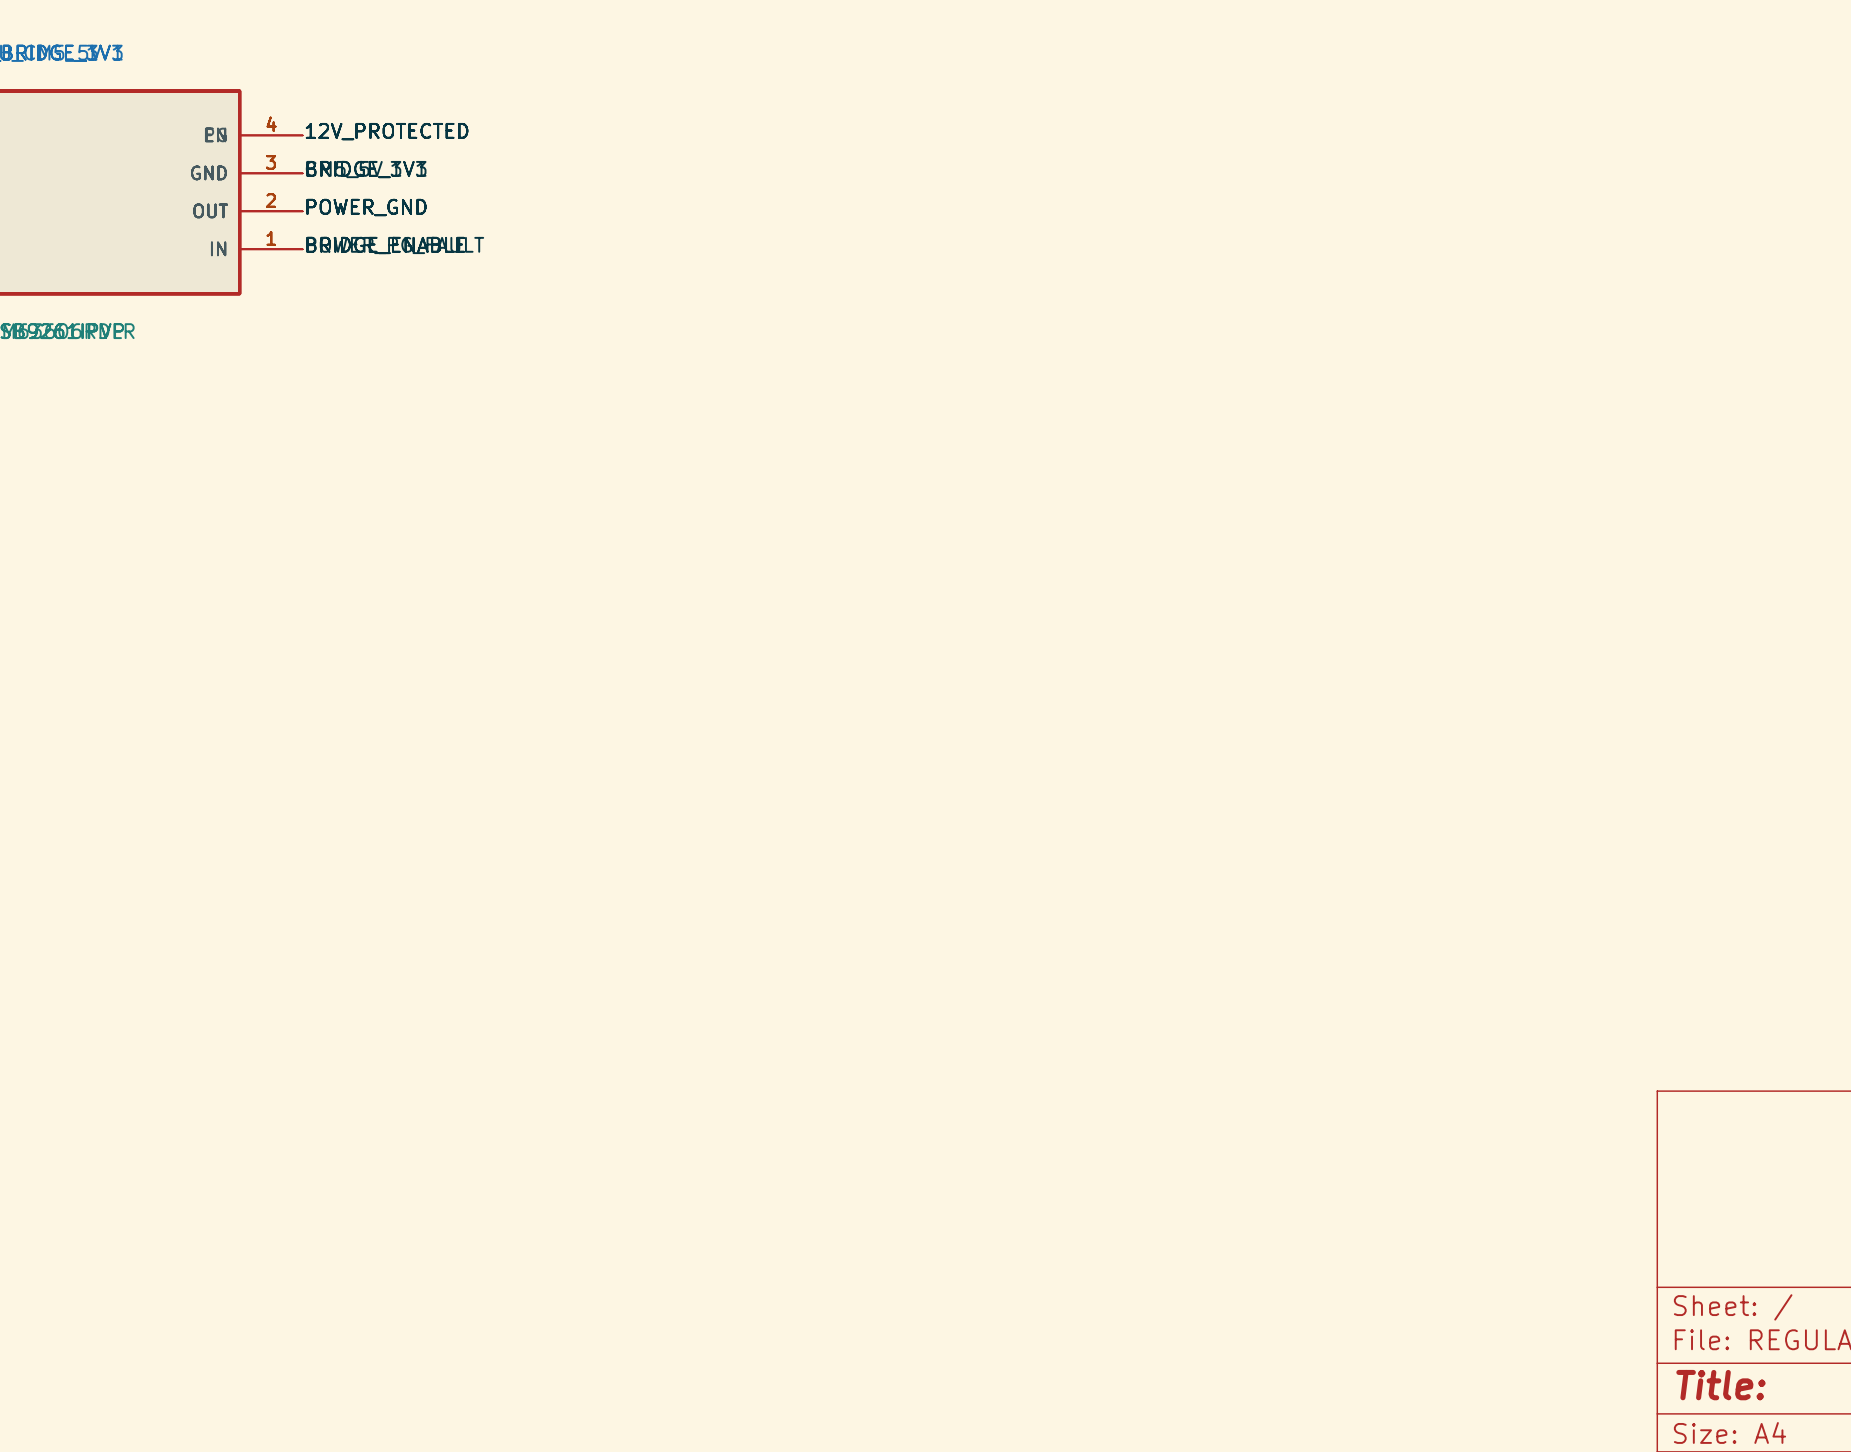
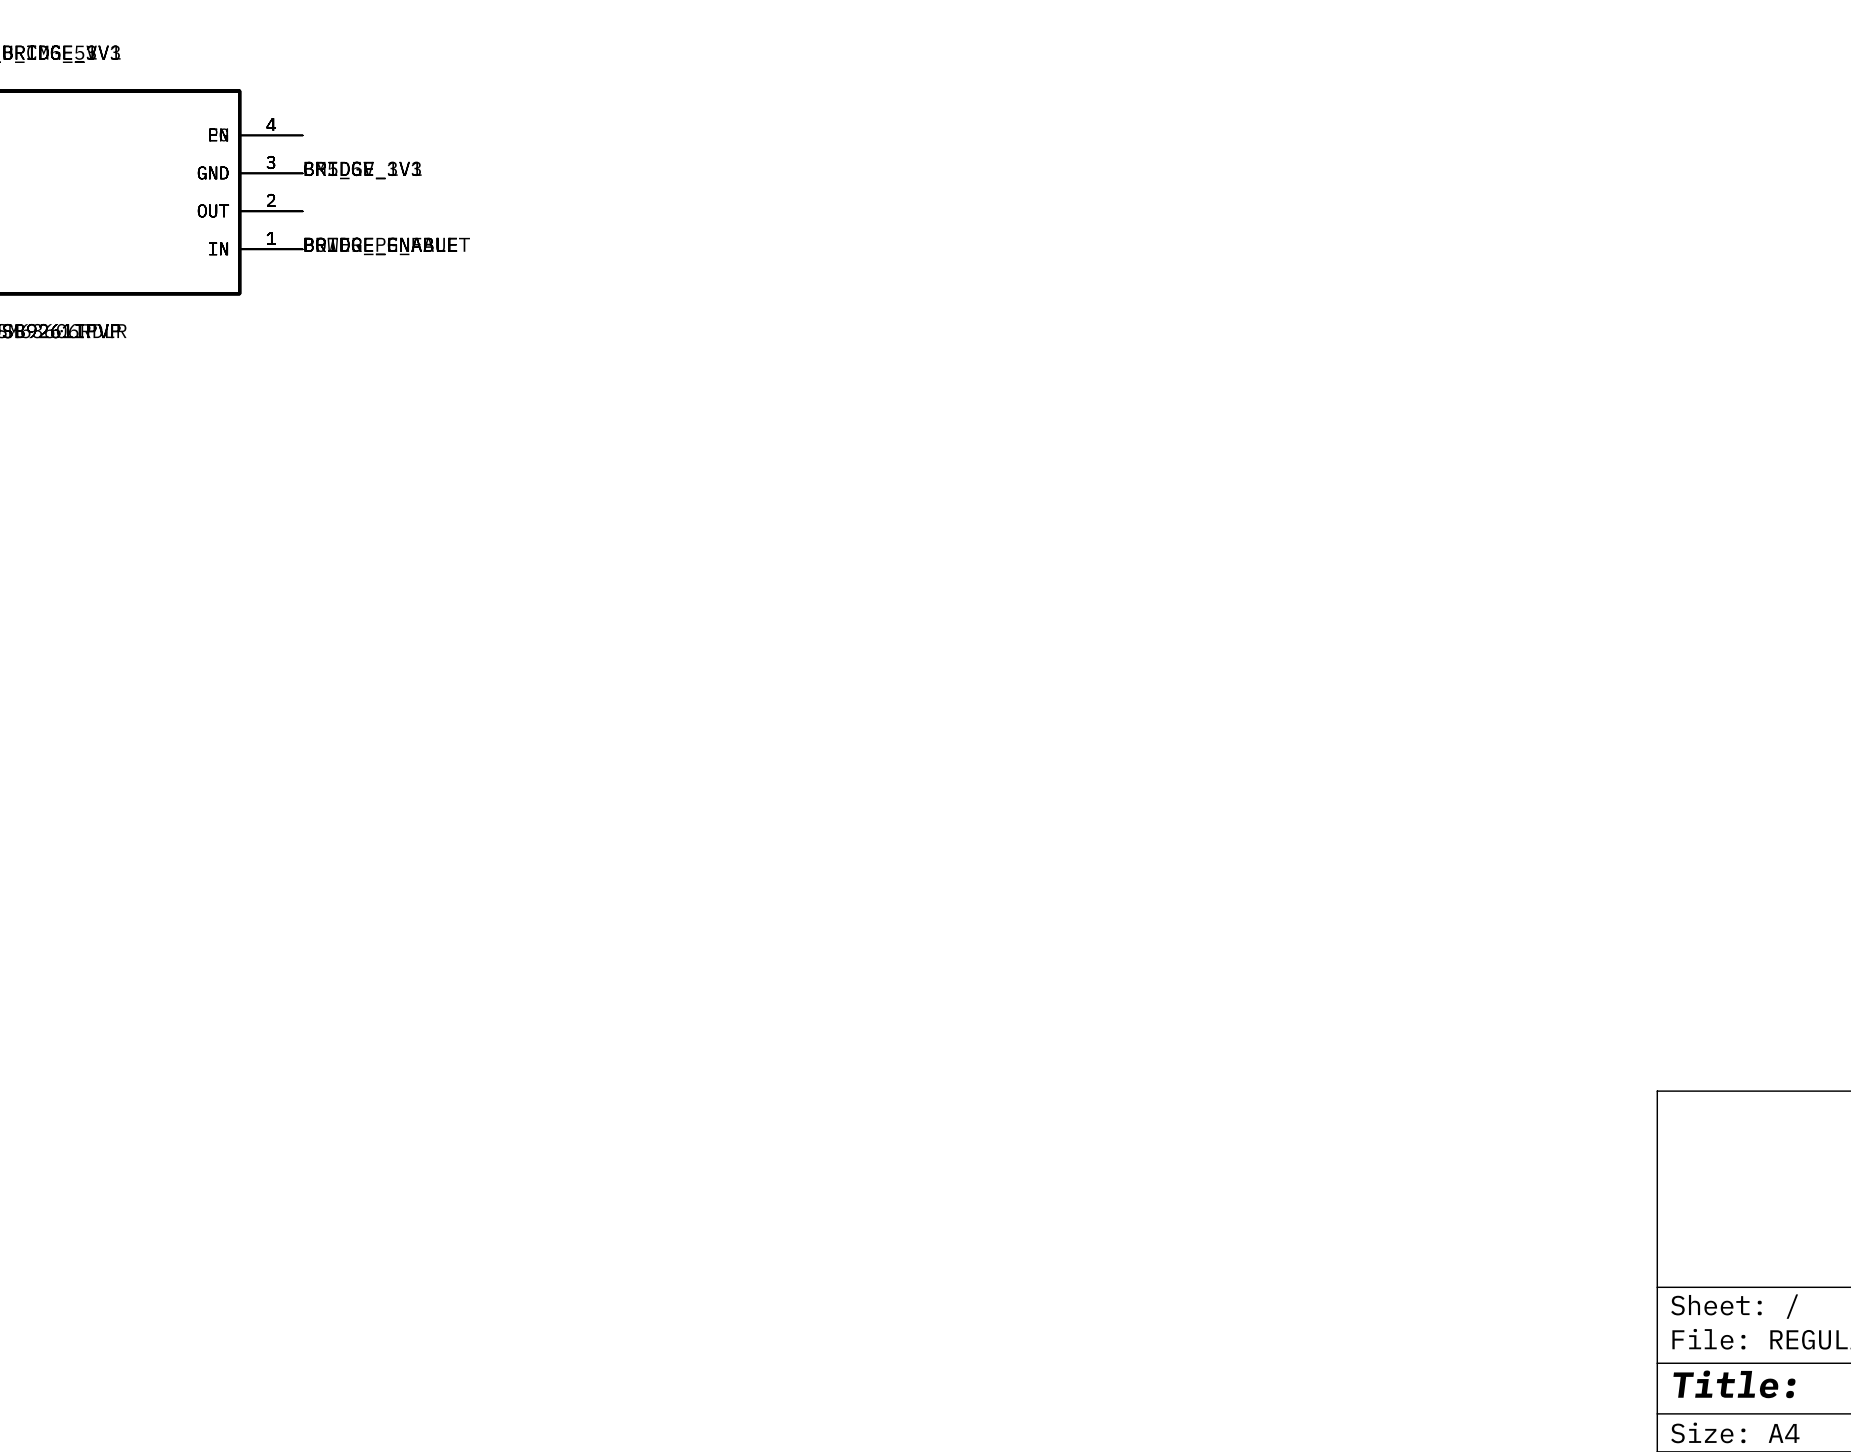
label: 12V_PROTECTED (387, 131) -> none
label: POWER_GND (366, 207) -> none

